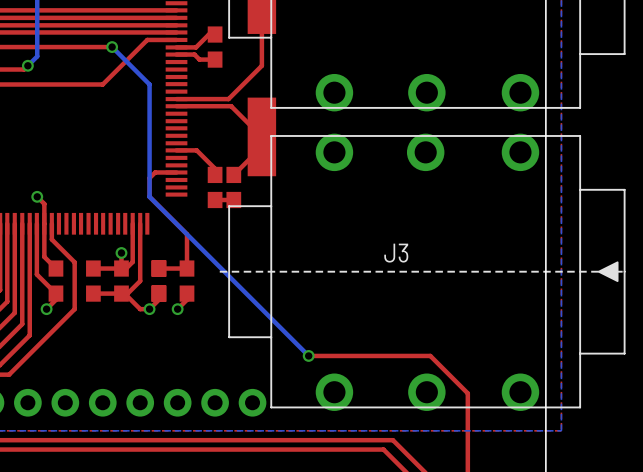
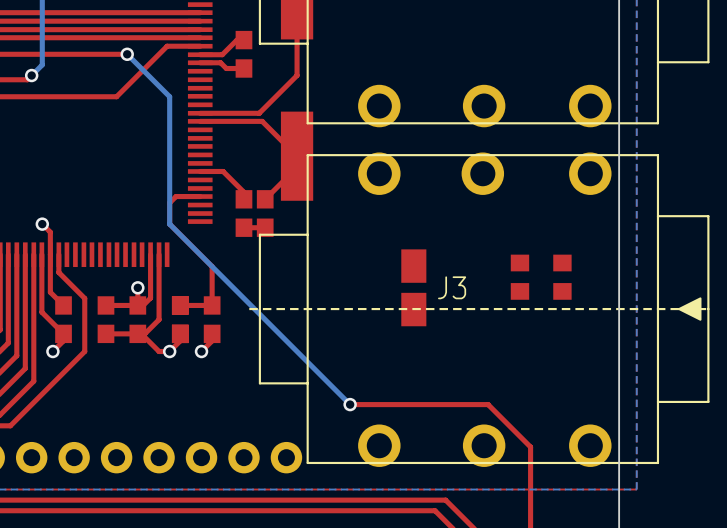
part: none -> (519, 277)
part: none -> (562, 277)
part: none -> (413, 287)

